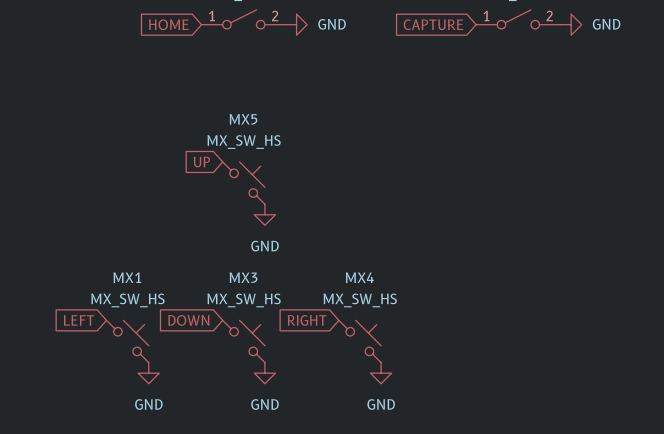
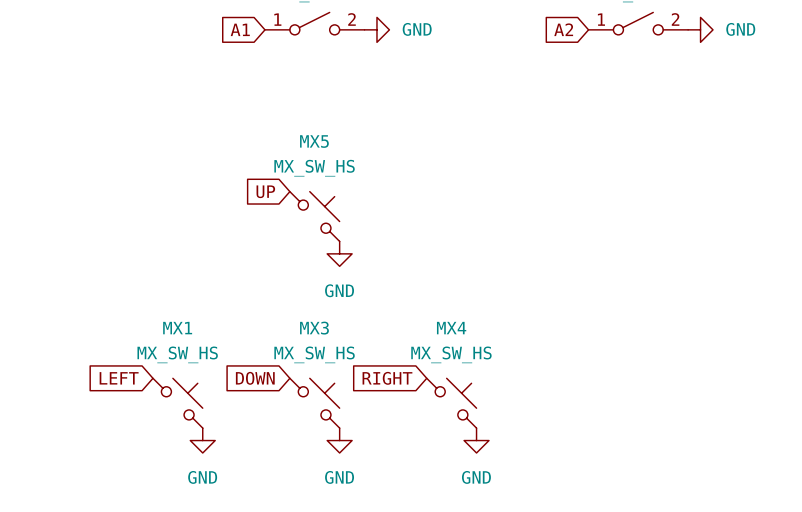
global label: HOME (168, 24) -> A1 (240, 29)
global label: CAPTURE (433, 24) -> A2 (563, 29)

